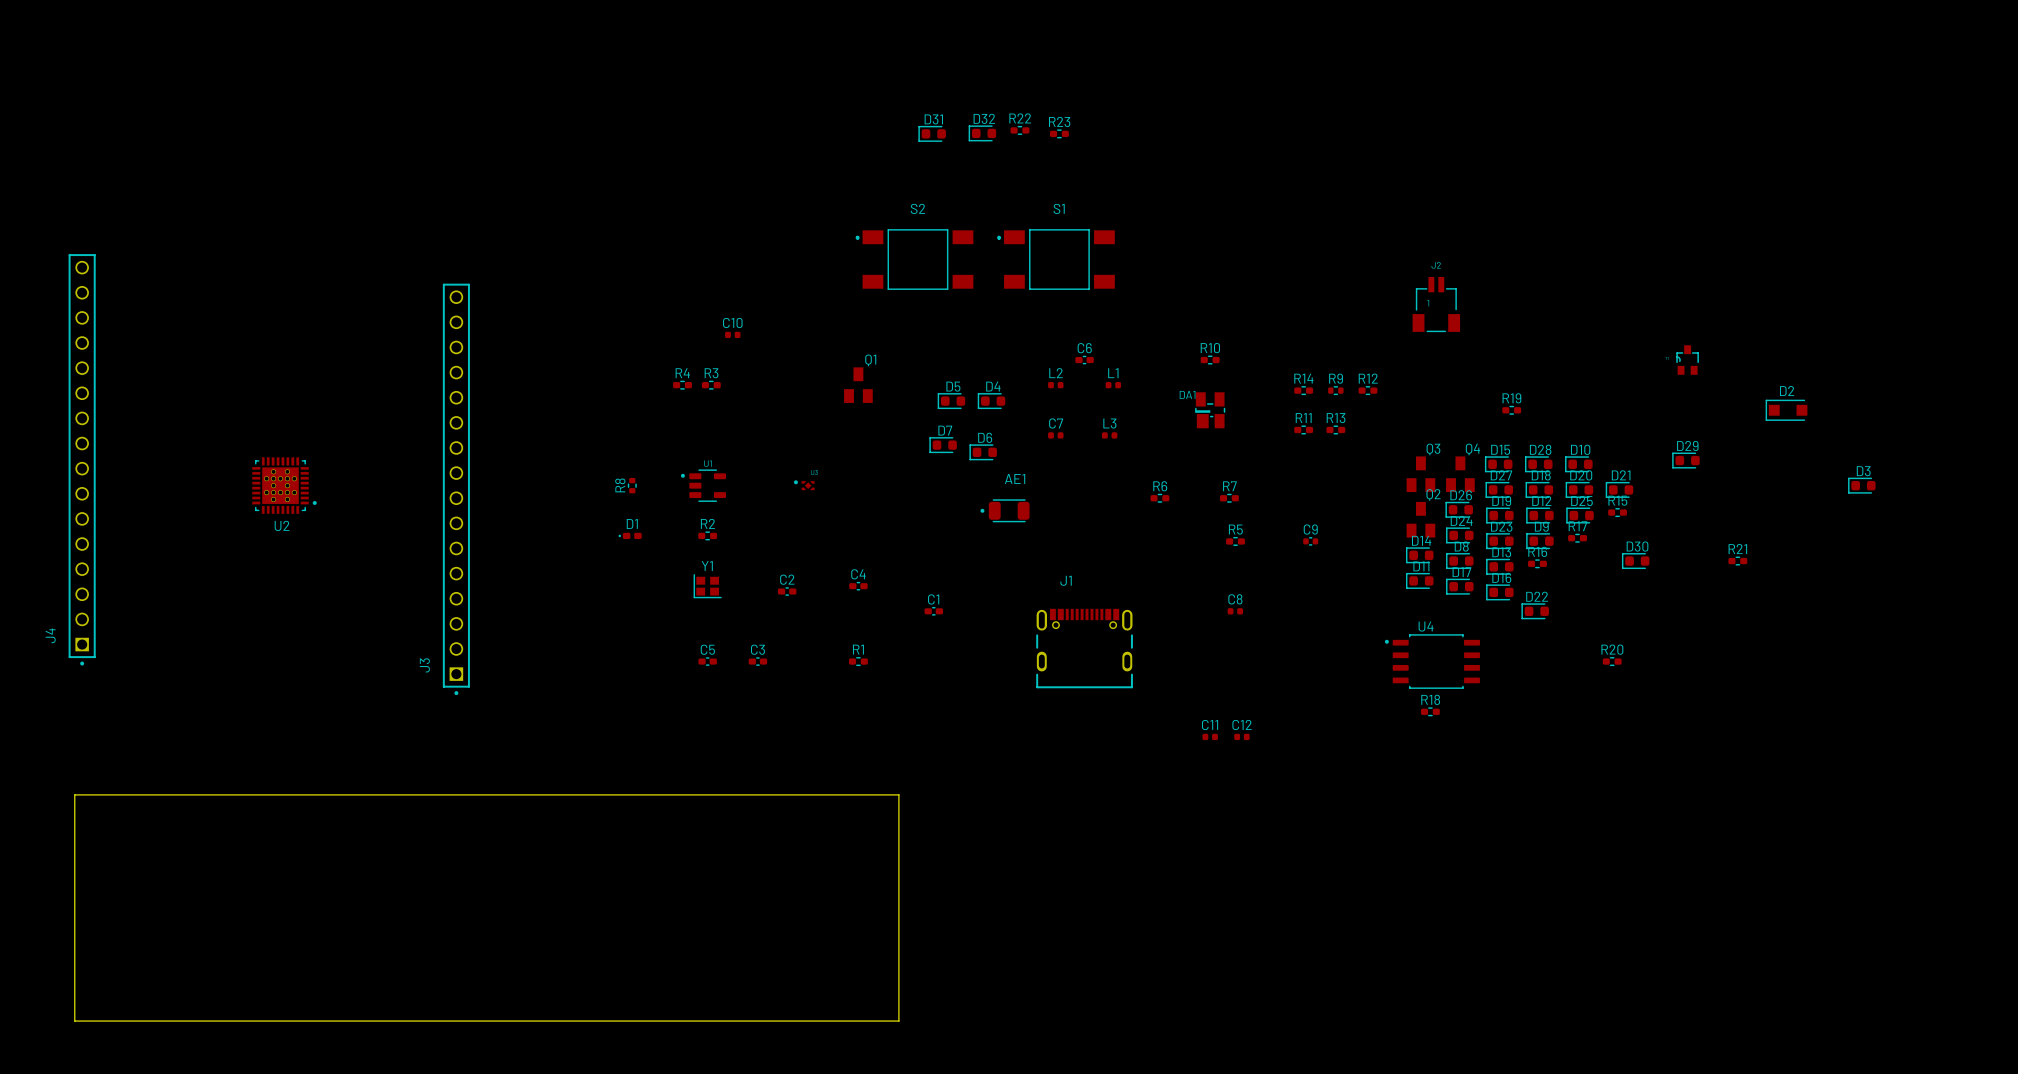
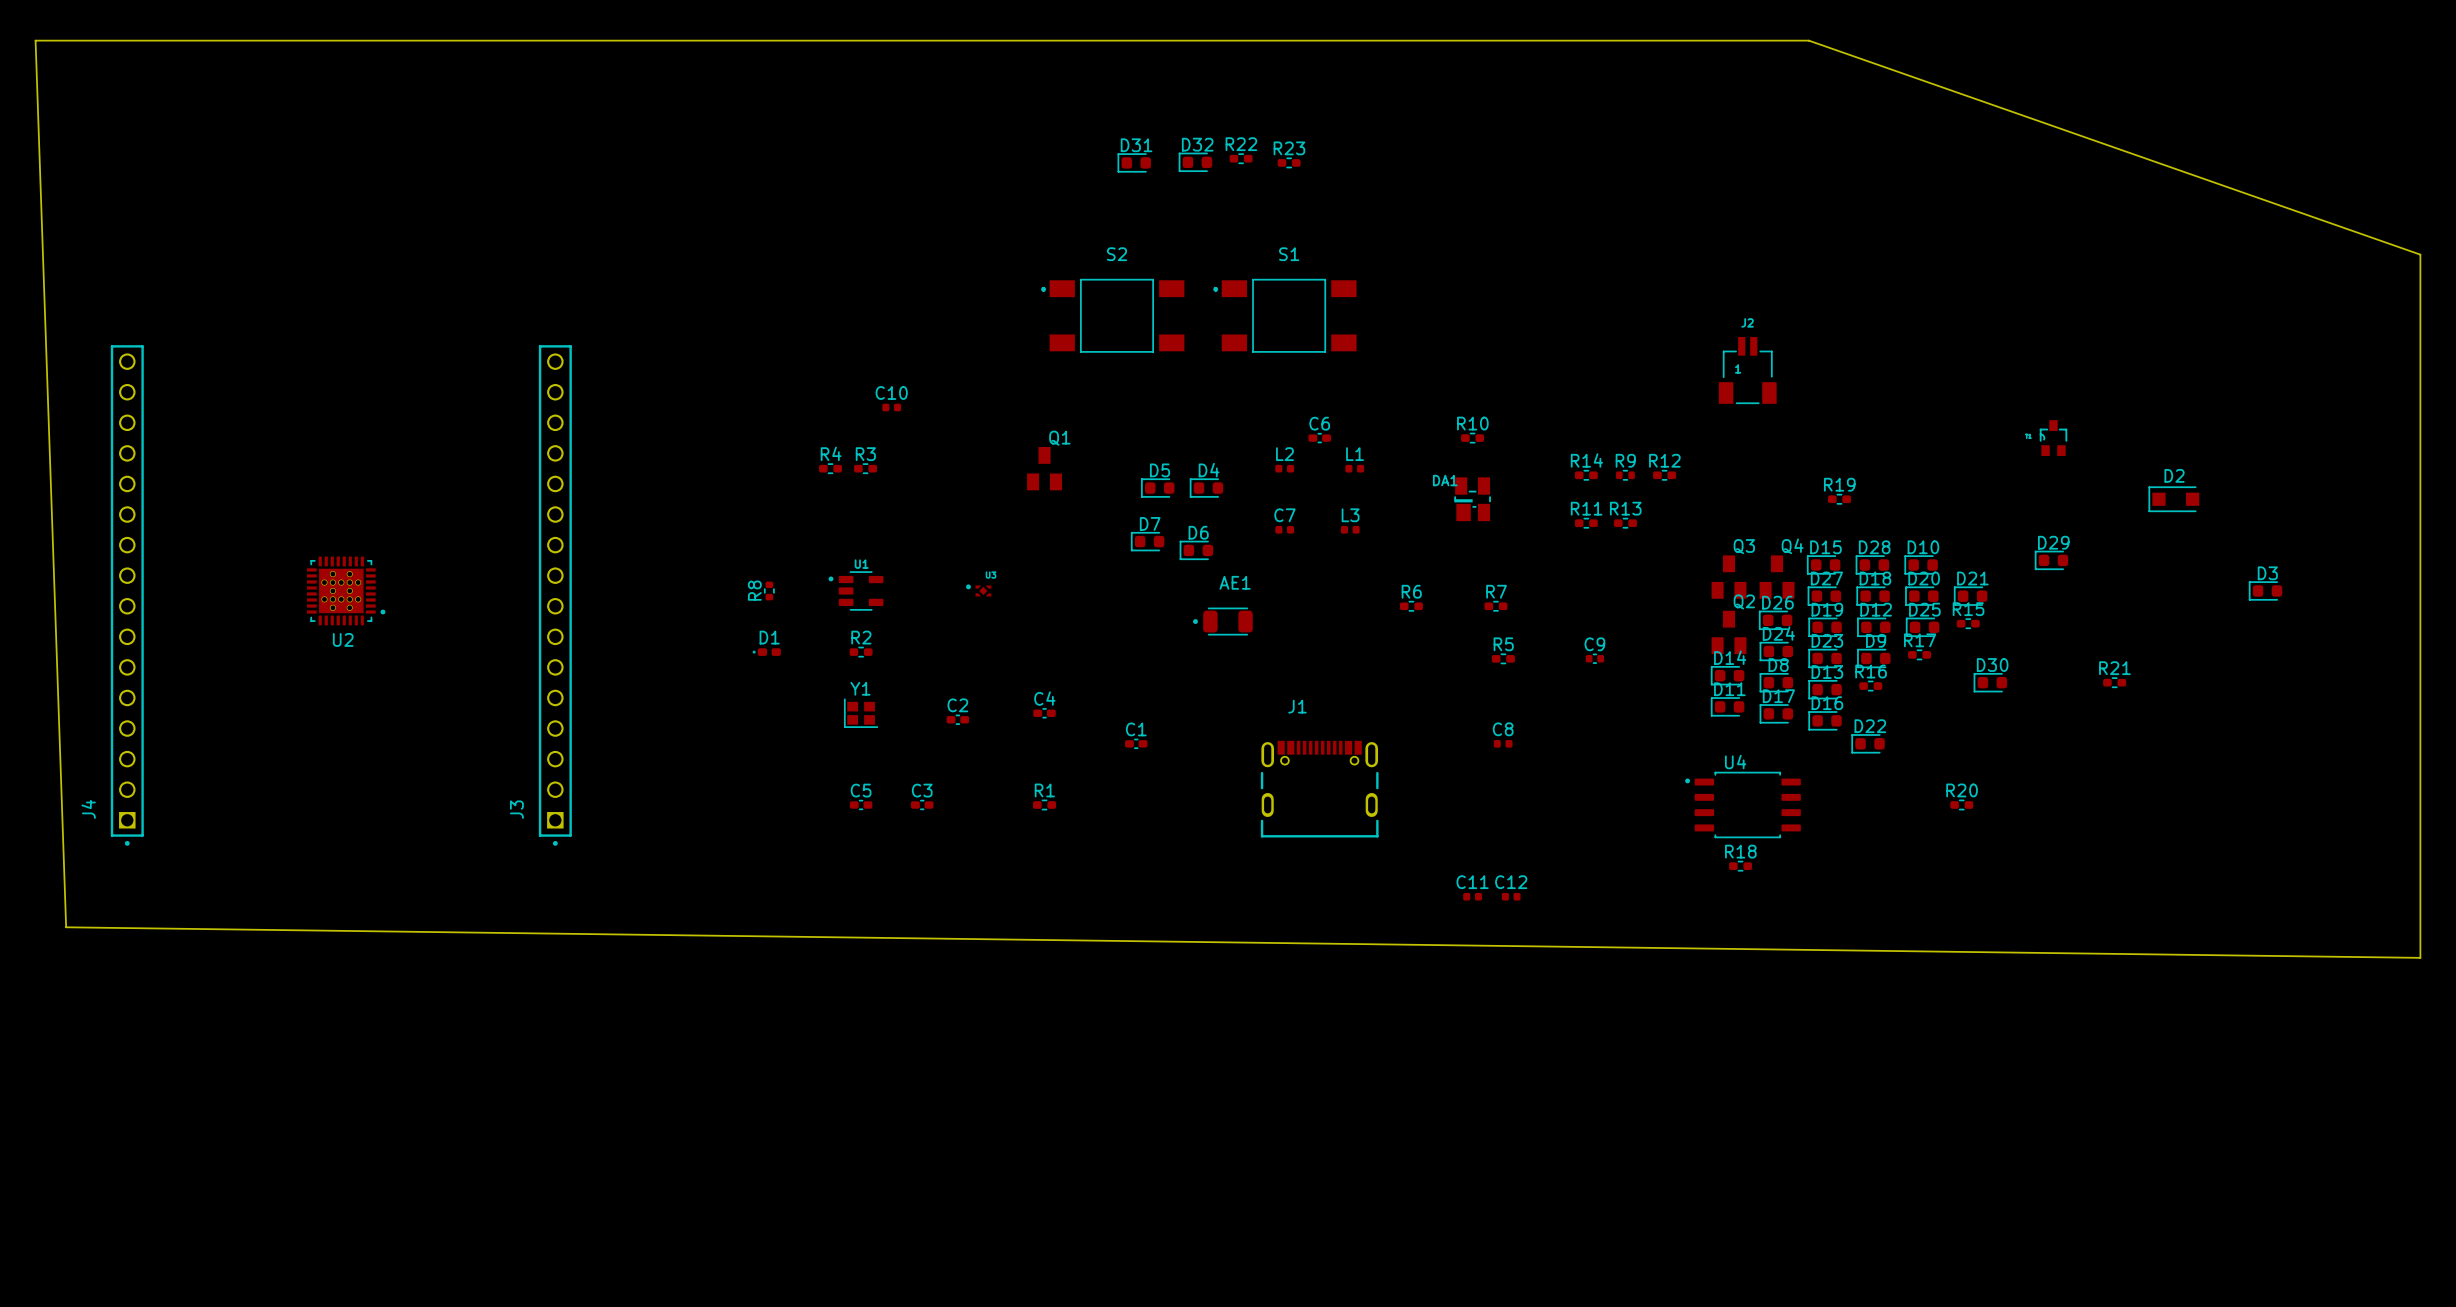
board edge: none -> (35, 40) (66, 927) (2420, 957) (2420, 254) (1808, 40) (35, 40)
J4 position: (82, 459) -> (127, 595)
board edge: (74, 794) (898, 794) (898, 1021) (74, 1021) (74, 794) -> none

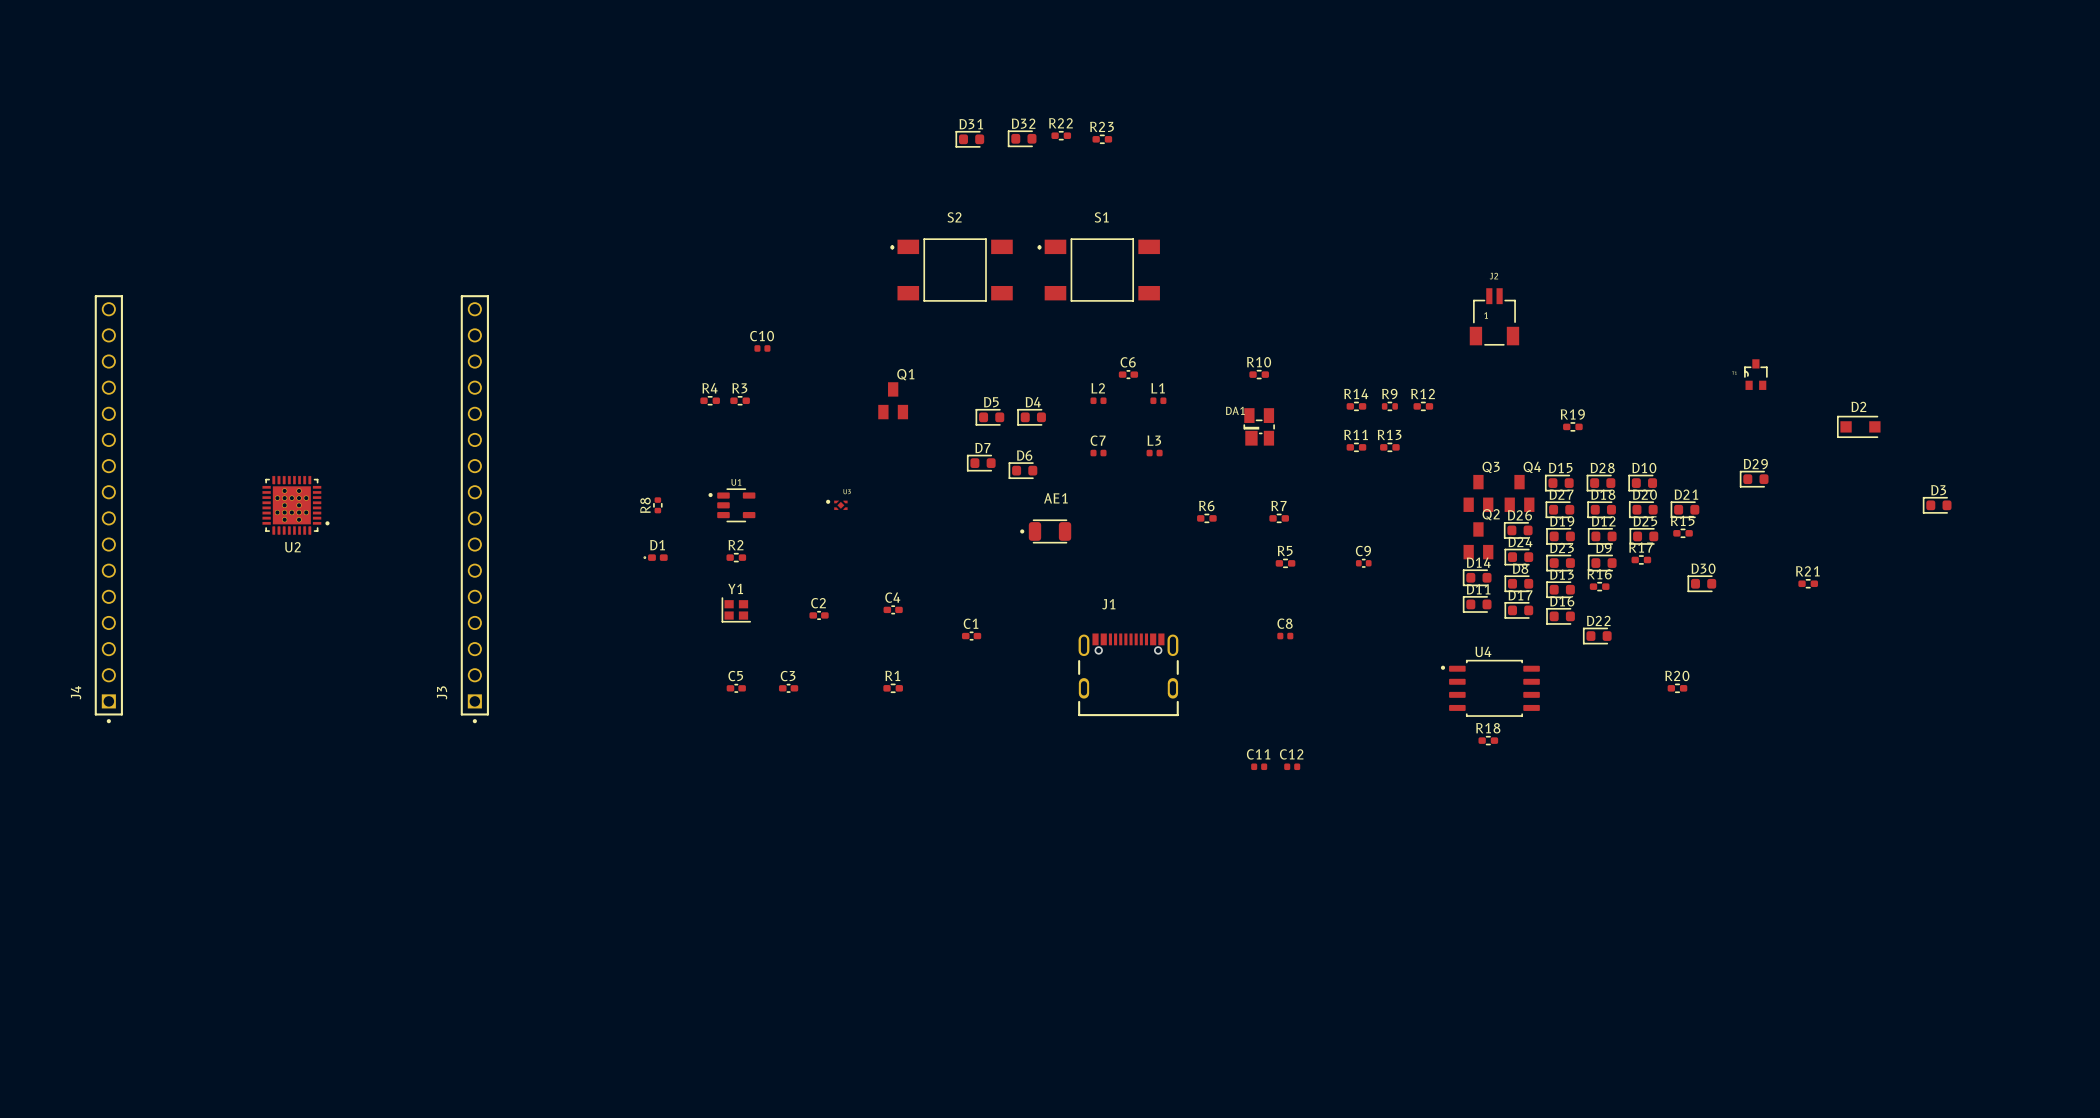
board edge: (35, 40) (66, 927) (2420, 957) (2420, 254) (1808, 40) (35, 40) -> none

